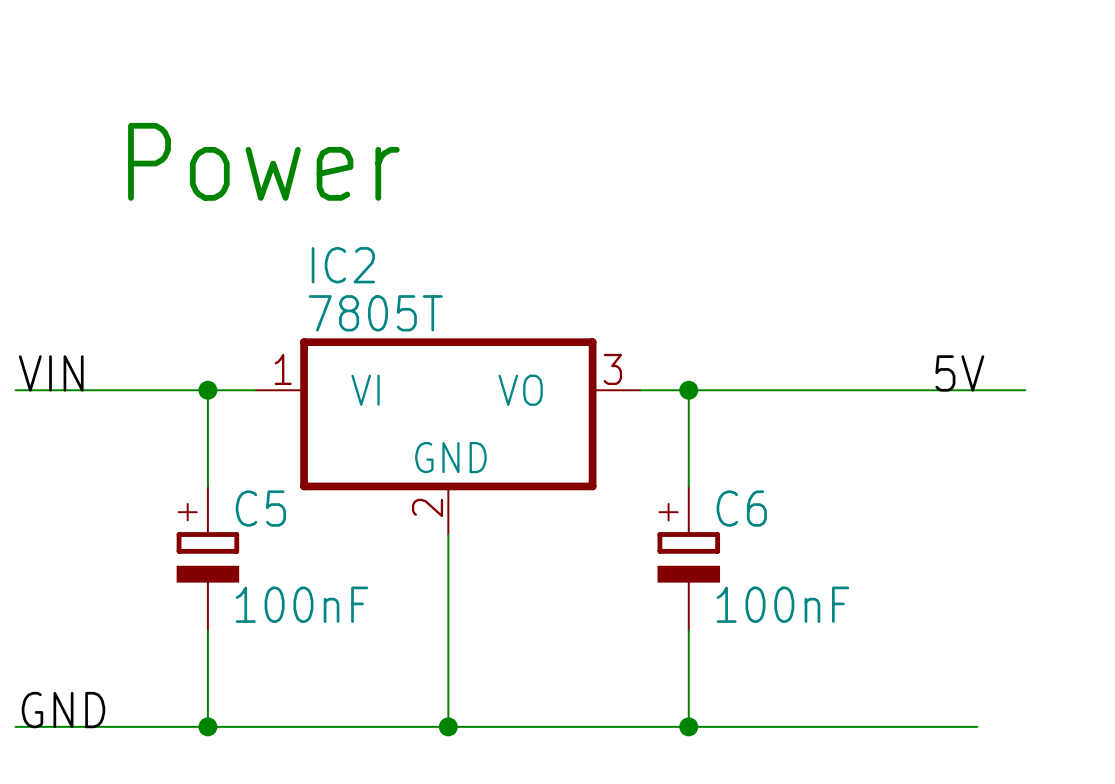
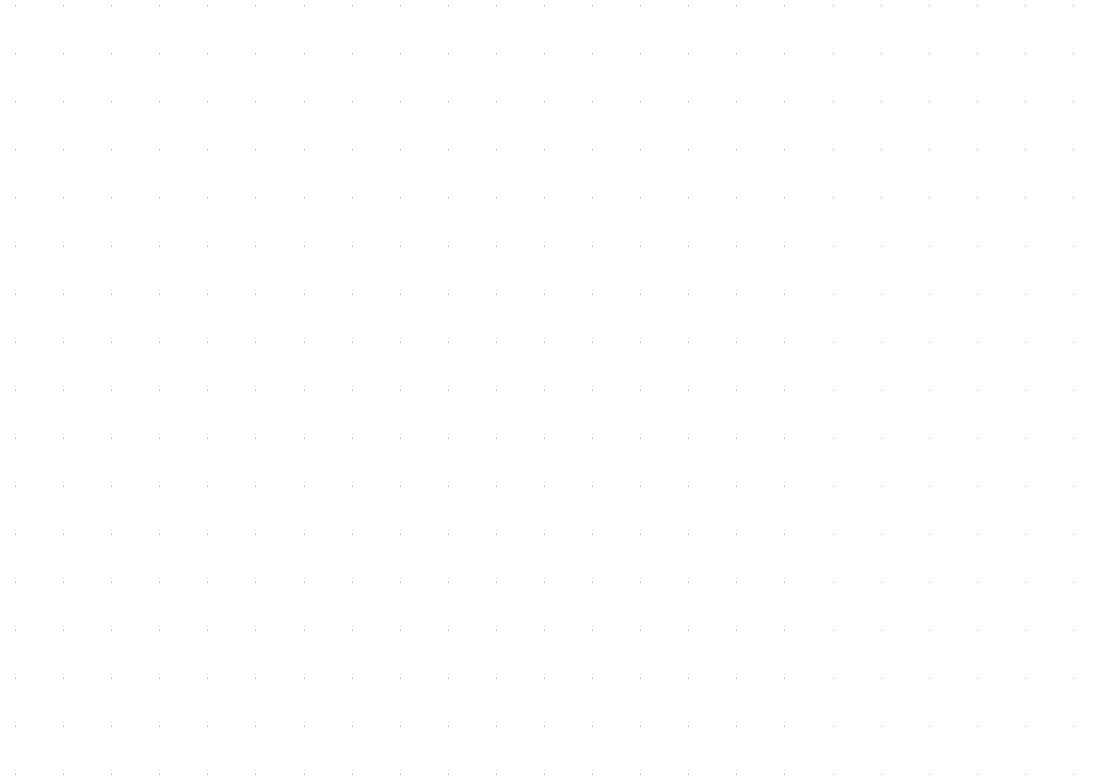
text: Power (263, 161) -> none
label: VIN (51, 373) -> none
label: 5V (959, 373) -> none
wire: (15, 390) (255, 390) -> none
wire: (207, 390) (207, 486) -> none
junction: (207, 390) -> none
wire: (640, 390) (1025, 390) -> none
wire: (688, 390) (688, 486) -> none
junction: (688, 390) -> none
IC2: 7805T (448, 436) -> none
wire: (448, 534) (448, 726) -> none
C5: 100nF (207, 558) -> none
C6: 100nF (688, 558) -> none
wire: (207, 630) (207, 726) -> none
wire: (688, 630) (688, 726) -> none
label: GND (63, 710) -> none
wire: (15, 726) (977, 726) -> none
junction: (207, 726) -> none
junction: (448, 726) -> none
junction: (688, 726) -> none

